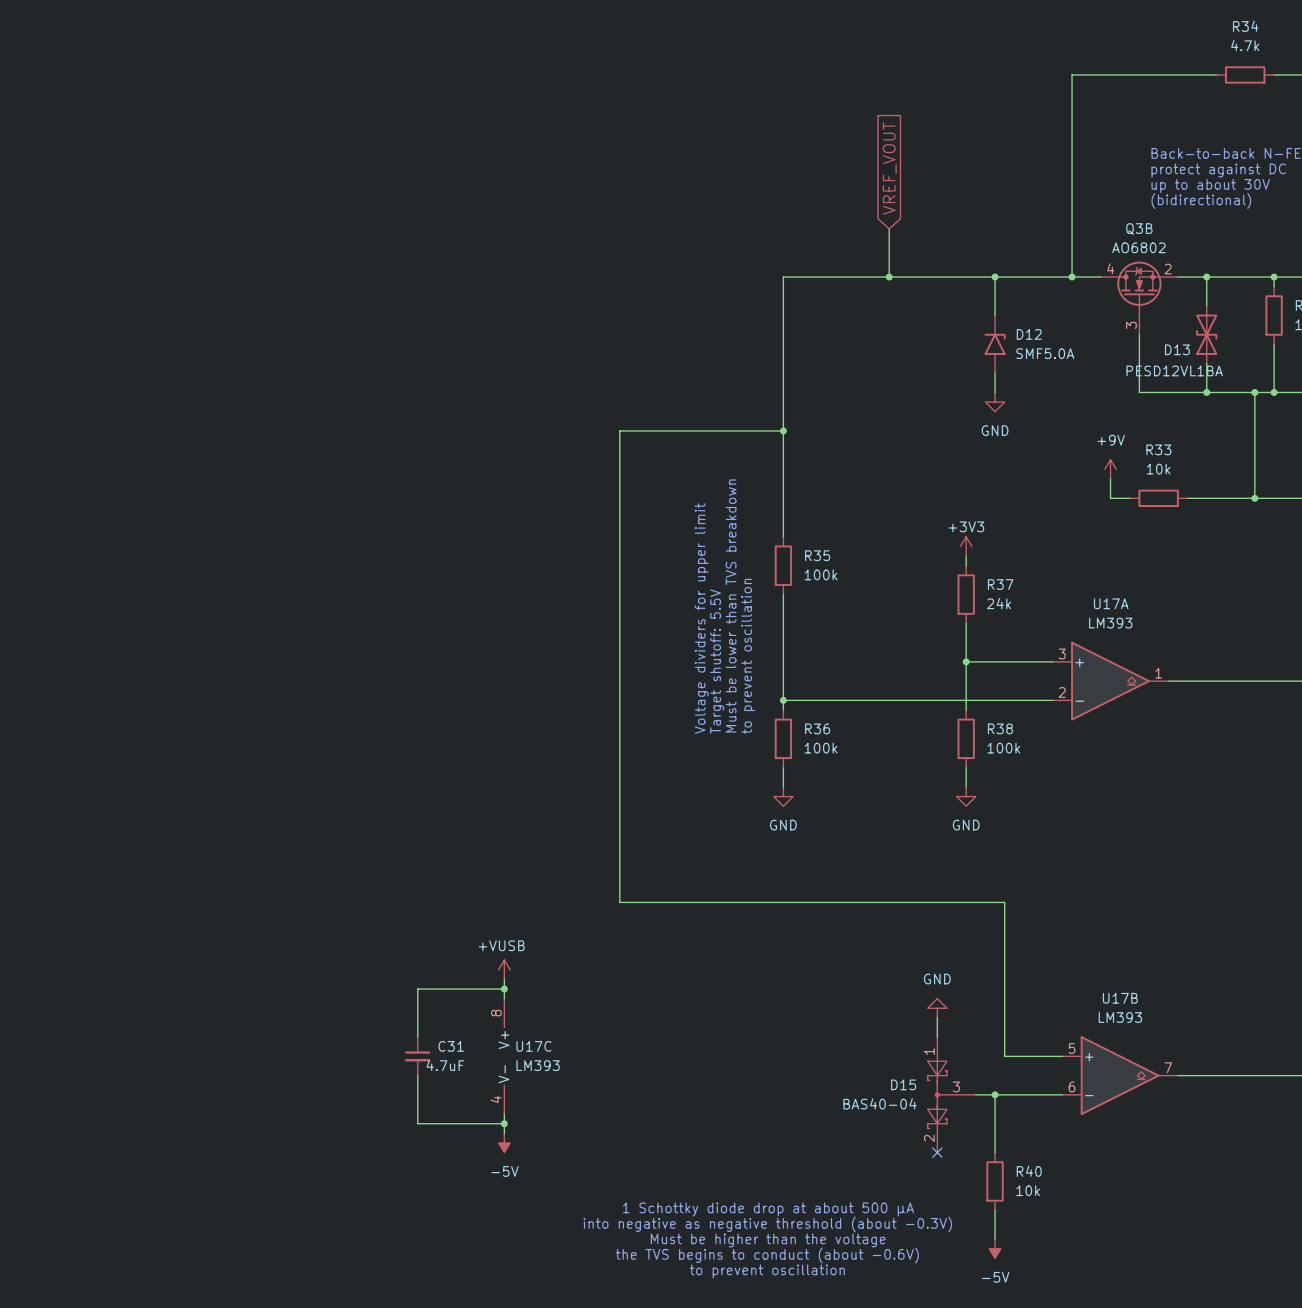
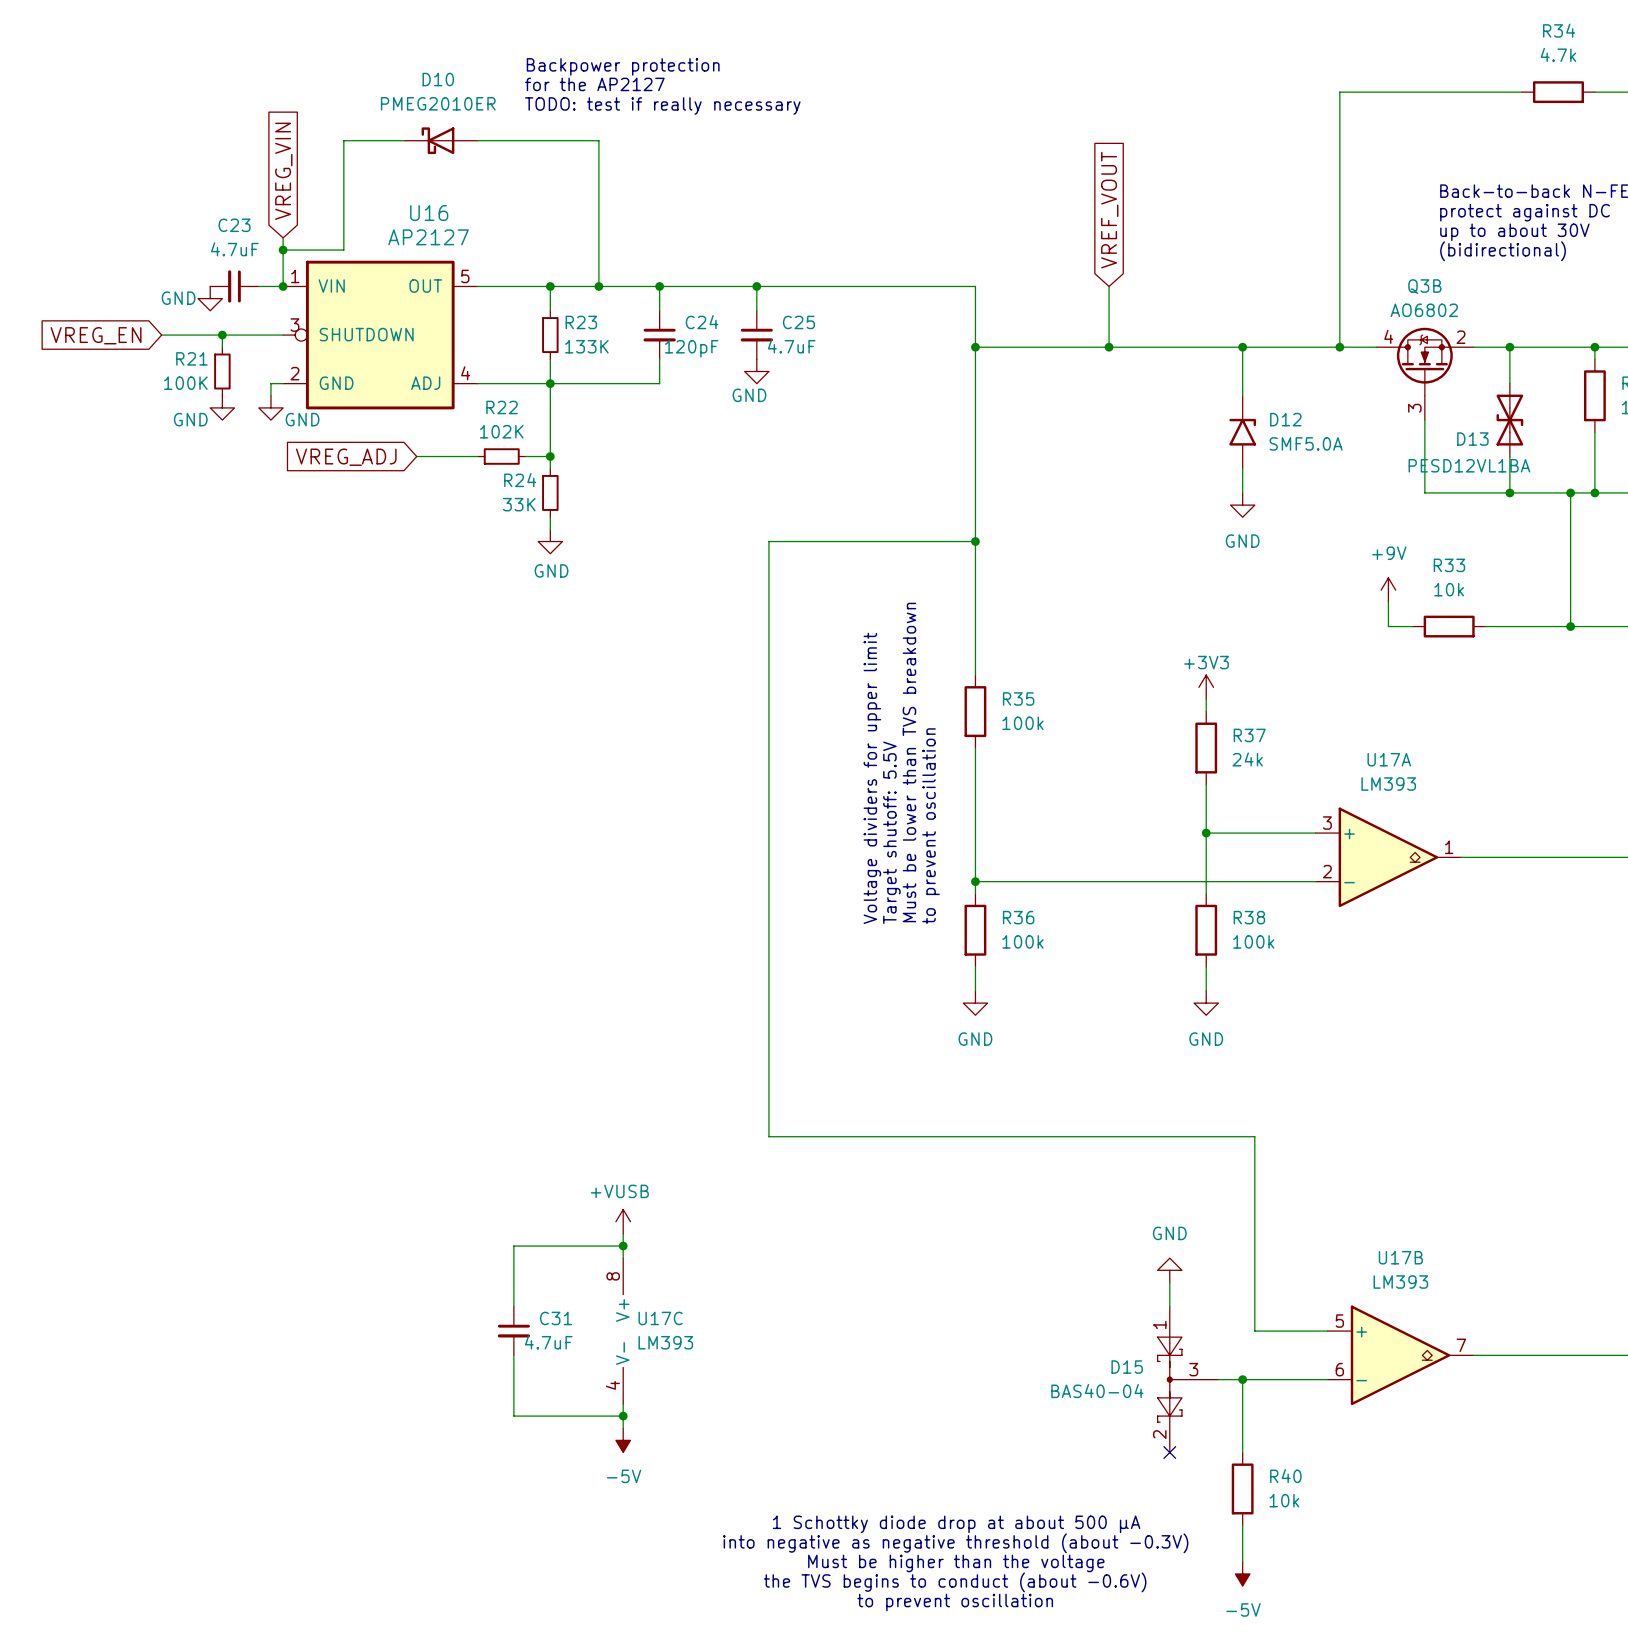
text: none -> Backpower protection (623, 66)
text: none -> for the AP2127 (594, 84)
text: none -> TODO: test if really necessary (662, 106)
wire: none -> (404, 140) (343, 140) (343, 250) (283, 250)
D10: none -> PMEG2010ER (441, 140)
wire: none -> (477, 140) (598, 140) (598, 286)
global label: none -> VREG_VIN (283, 171)
wire: none -> (283, 237) (283, 286) (258, 286)
junction: none -> (283, 250)
C23: none -> 4.7uF (234, 286)
junction: none -> (283, 286)
wire: none -> (477, 286) (975, 286) (975, 347)
wire: none -> (550, 286) (550, 310)
junction: none -> (550, 286)
junction: none -> (598, 286)
wire: none -> (659, 286) (659, 310)
junction: none -> (659, 286)
wire: none -> (756, 286) (756, 310)
junction: none -> (756, 286)
power symbol: none -> GND (210, 298)
global label: none -> VREG_EN (96, 335)
wire: none -> (161, 335) (283, 335)
wire: none -> (222, 335) (222, 347)
junction: none -> (222, 335)
U16: none -> AP2127 (380, 335)
R23: none -> 133K (550, 335)
C24: none -> 120pF (659, 335)
C25: none -> 4.7uF (756, 335)
junction: none -> (975, 347)
wire: none -> (550, 359) (550, 468)
wire: none -> (659, 359) (659, 383) (477, 383)
R21: none -> 100K (222, 371)
power symbol: none -> GND (756, 371)
wire: none -> (283, 383) (270, 383) (270, 395)
junction: none -> (550, 383)
power symbol: none -> GND (222, 407)
power symbol: none -> GND (270, 407)
wire: none -> (416, 456) (477, 456)
R22: none -> 102K (501, 456)
wire: none -> (526, 456) (550, 456)
junction: none -> (550, 456)
global label: none -> VREG_ADJ (346, 457)
R24: none -> 33K (550, 492)
wire: none -> (550, 517) (550, 529)
power symbol: none -> GND (550, 541)

